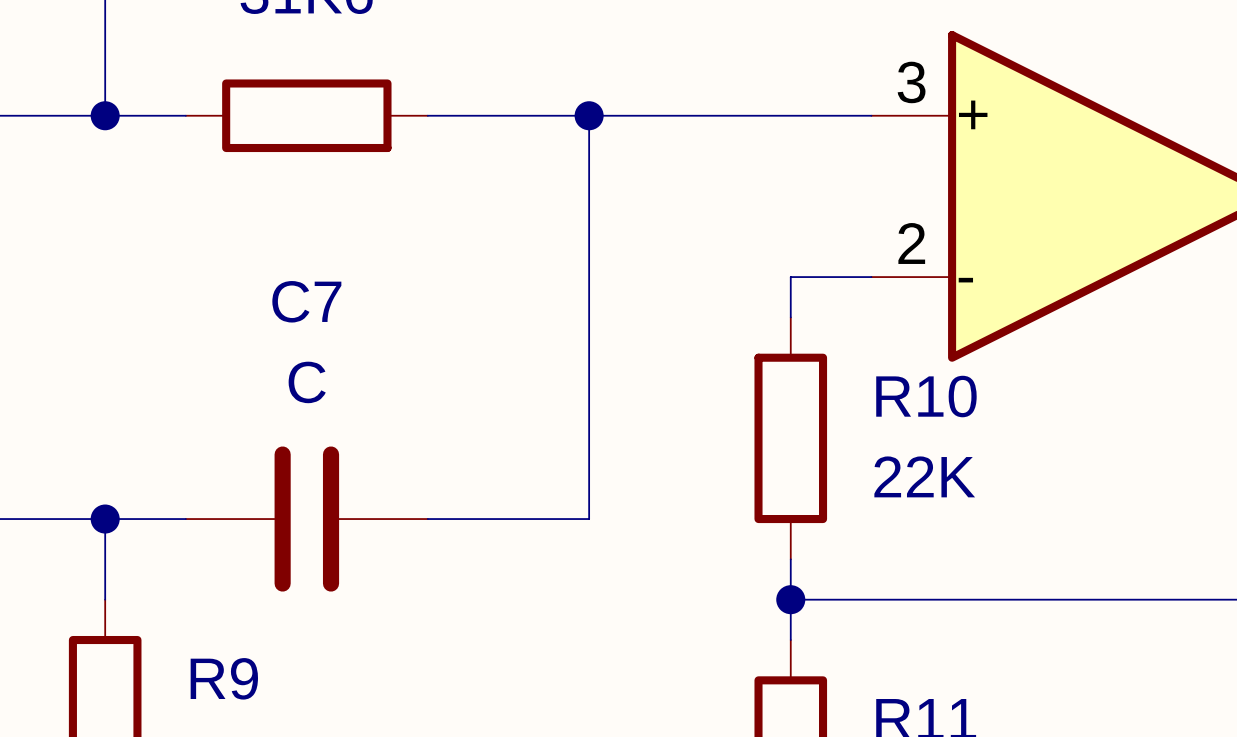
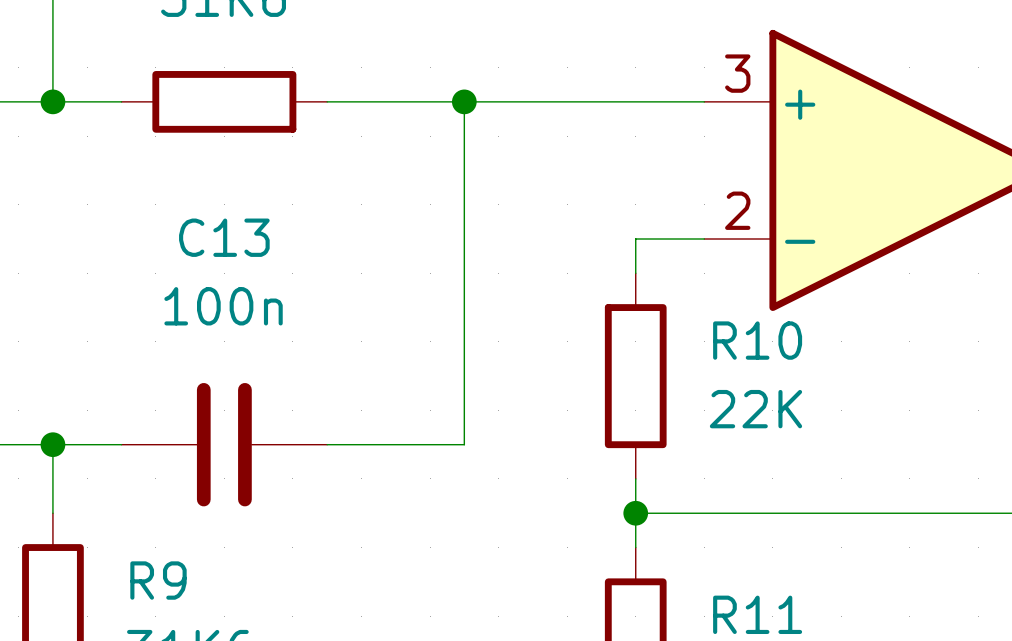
C7 name: C7 (306, 301) -> C13 (224, 237)
C7 value: C (307, 382) -> 100n (223, 306)

